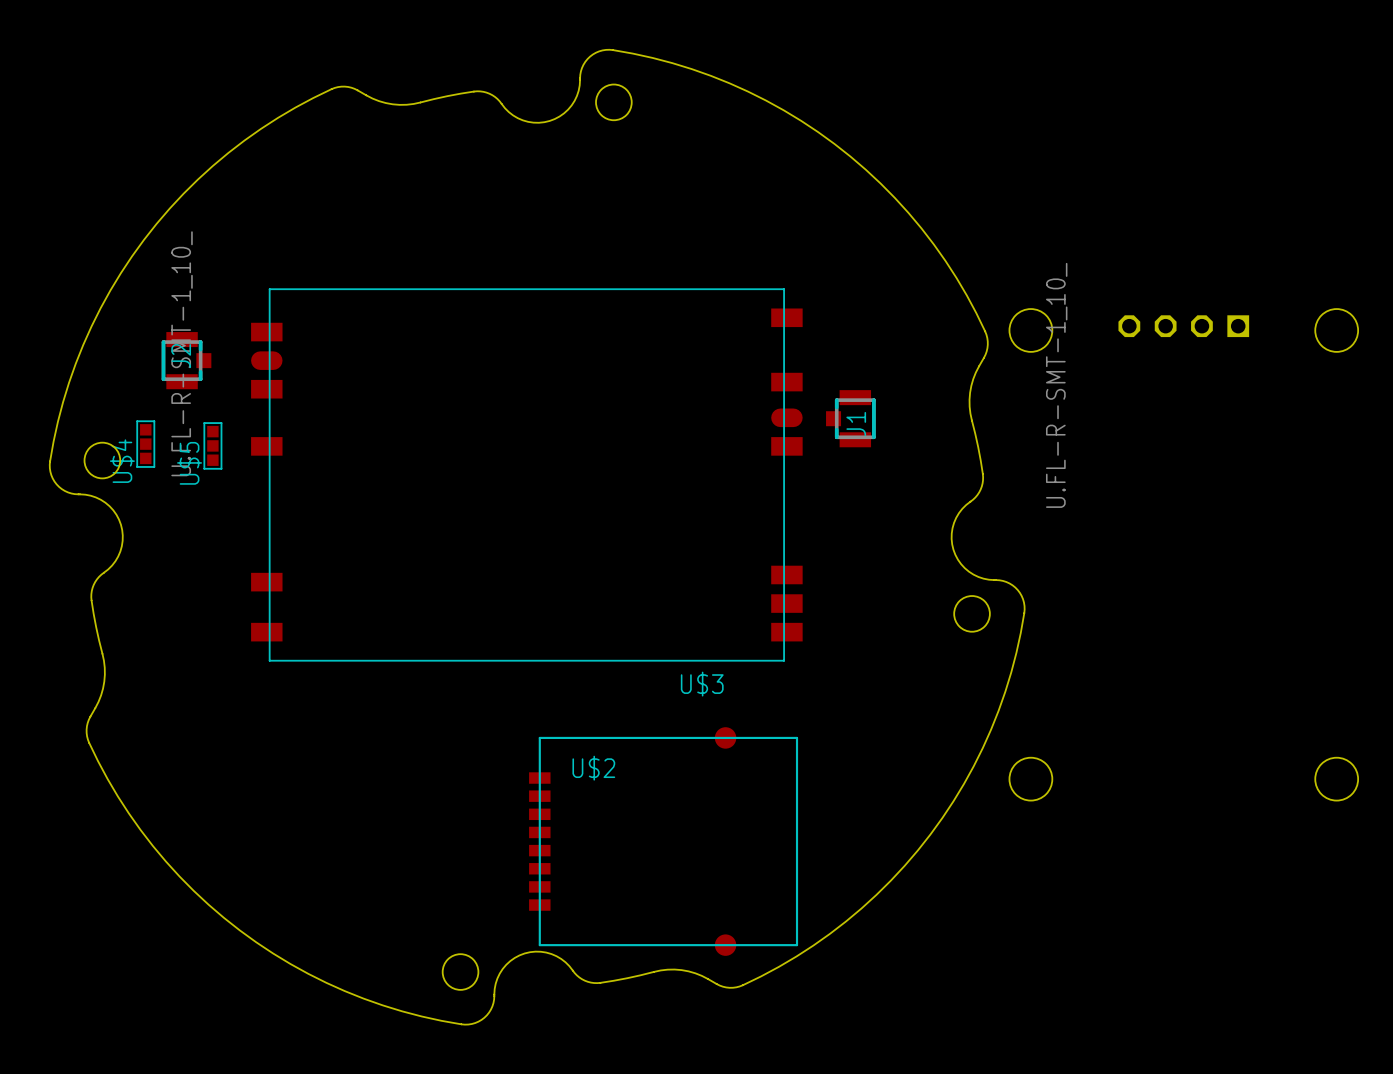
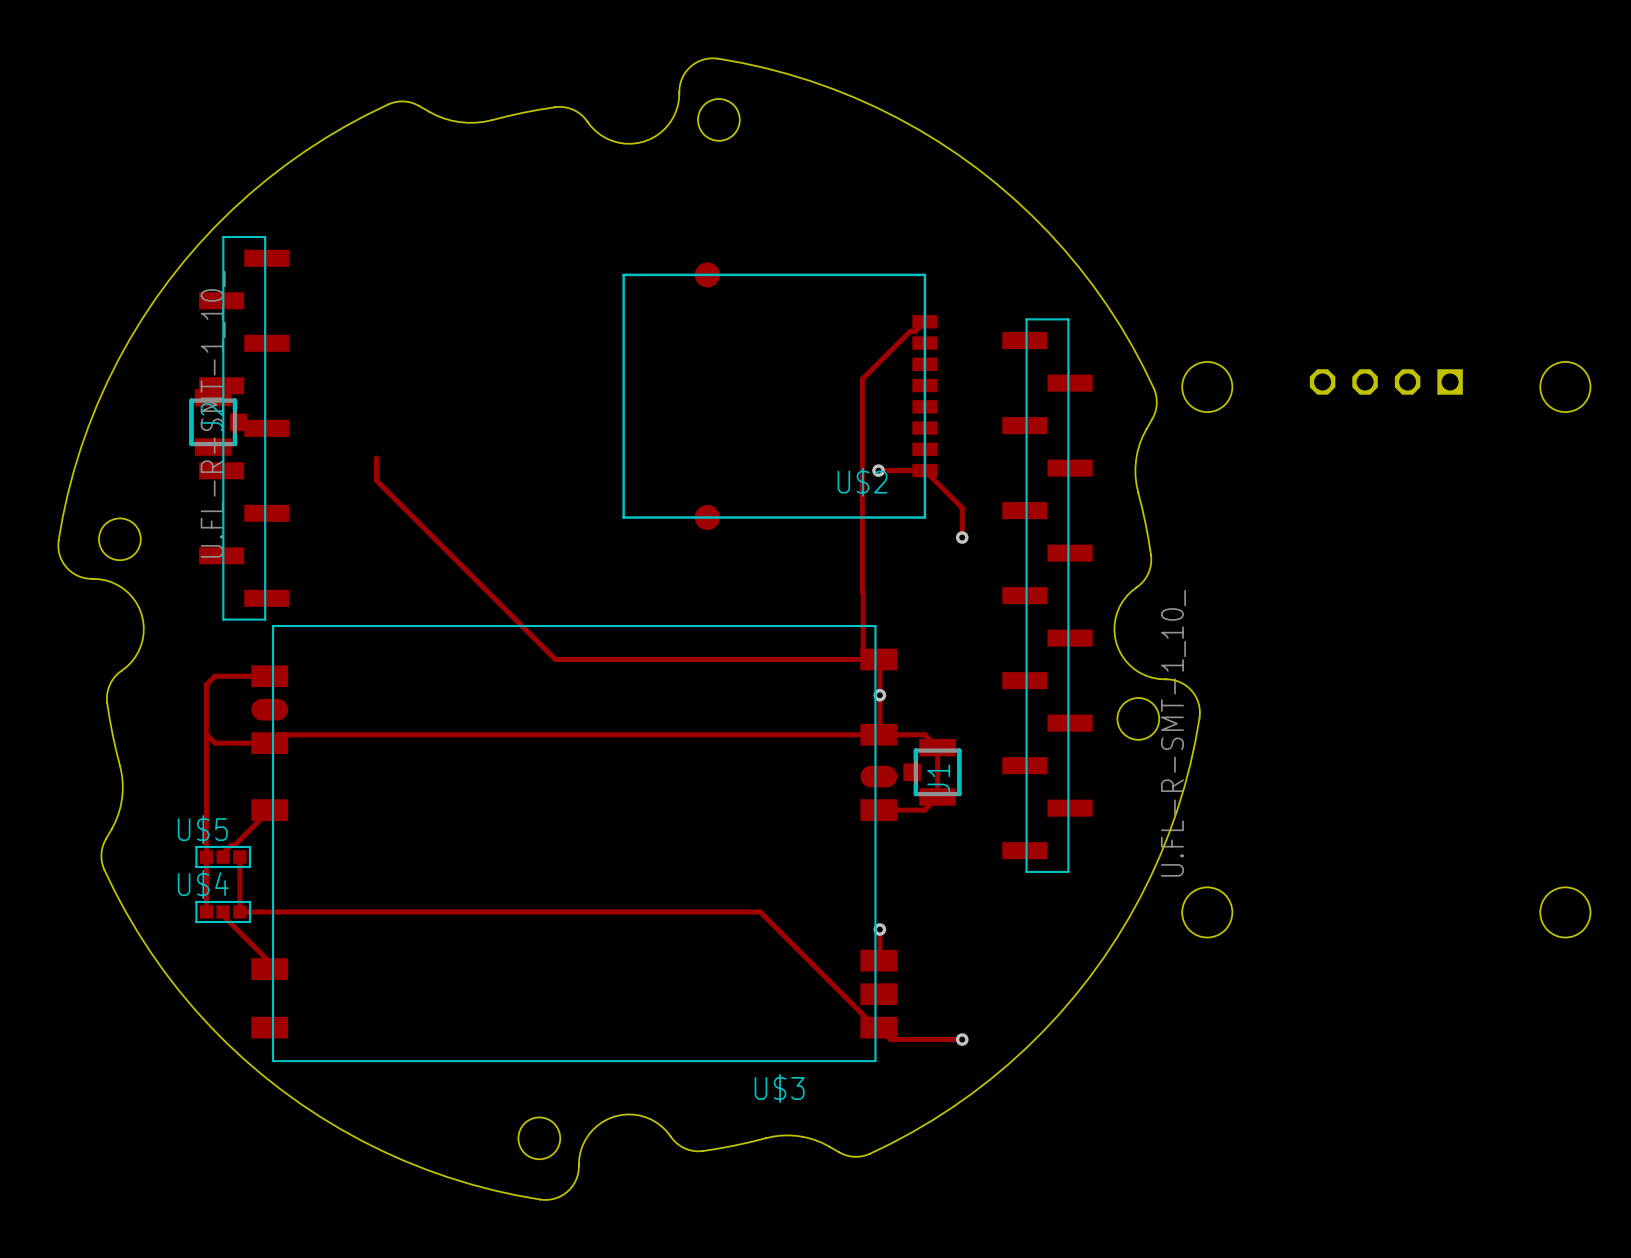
track: none -> (924, 321) (915, 331) (910, 331) (862, 379) (863, 659)
part: none -> (244, 428)
track: none -> (376, 458) (376, 480) (555, 659) (878, 659) (878, 734)
track: none -> (878, 470) (924, 470) (962, 507) (962, 537)
via: none -> (878, 470)
J1 position: (850, 418) -> (932, 772)
U$4 rotation: 0° (145, 444) -> 90° clockwise (223, 911)
U$4 position: (145, 444) -> (223, 911)
U$5 rotation: 0° (212, 445) -> 90° clockwise (223, 856)
U$5 position: (212, 445) -> (223, 856)
via: none -> (962, 537)
U$3 position: (526, 474) -> (574, 843)
part: none -> (1047, 595)
track: none -> (269, 676) (215, 676) (206, 685) (206, 856)
via: none -> (879, 695)
track: none -> (206, 734) (215, 743) (269, 743) (278, 734) (924, 734) (937, 747) (937, 796) (924, 810) (878, 810)
track: none -> (269, 810) (234, 845) (231, 845) (223, 853) (223, 856)
track: none -> (206, 856) (206, 911)
track: none -> (239, 856) (239, 911) (760, 911) (875, 1027) (878, 1027) (890, 1039) (962, 1039)
track: none -> (223, 911) (221, 913) (269, 962) (269, 969)
track: none -> (879, 929) (878, 960)
via: none -> (879, 929)
U$2 rotation: 0° (663, 841) -> 180° (779, 396)
U$2 position: (663, 841) -> (779, 396)
via: none -> (962, 1039)

